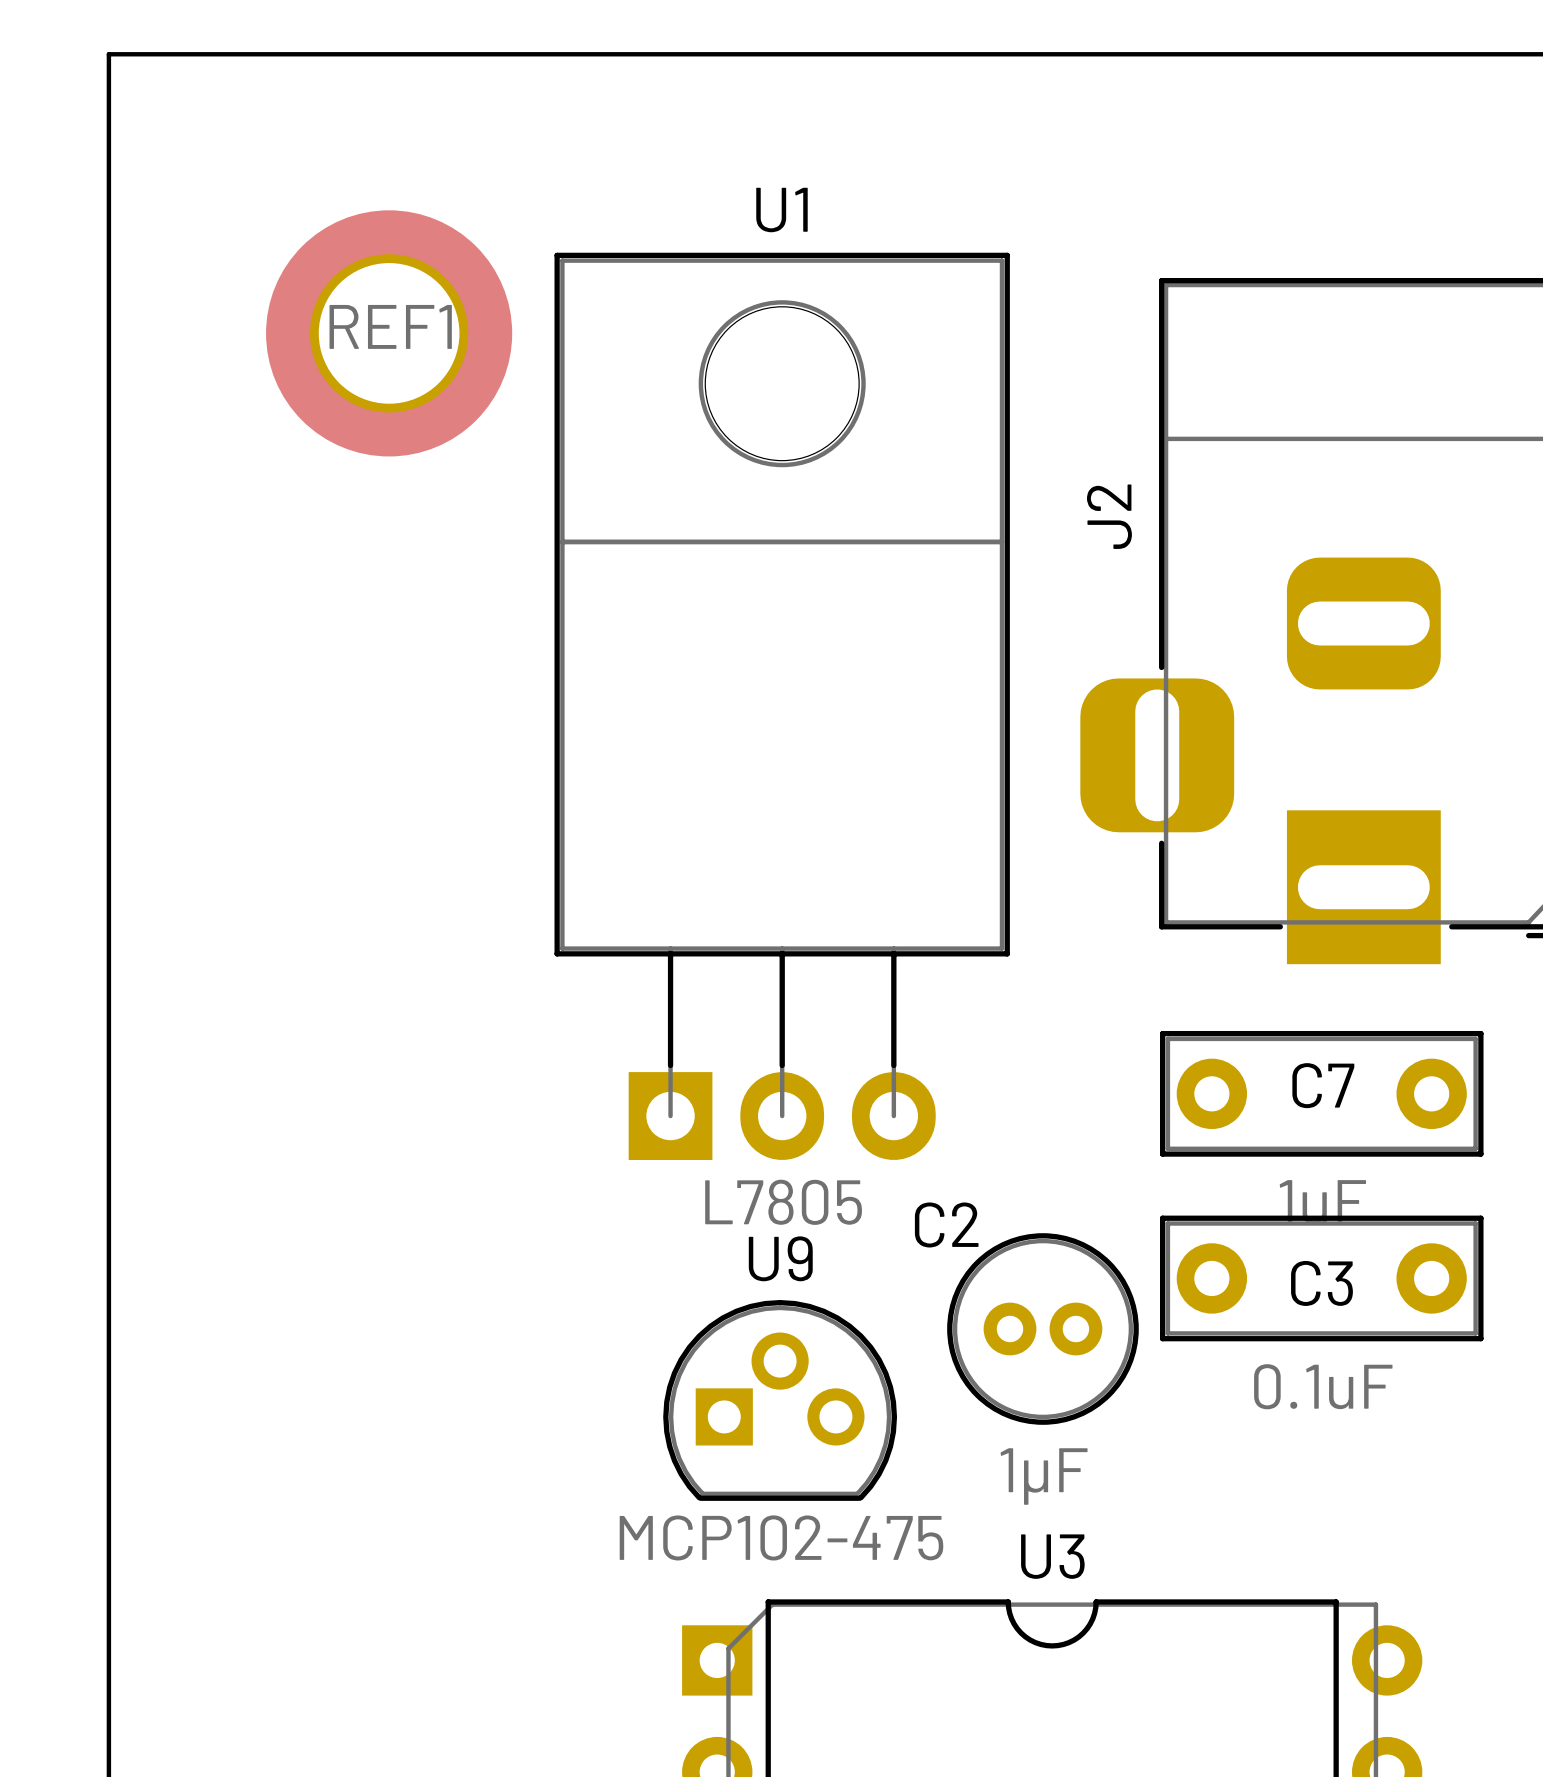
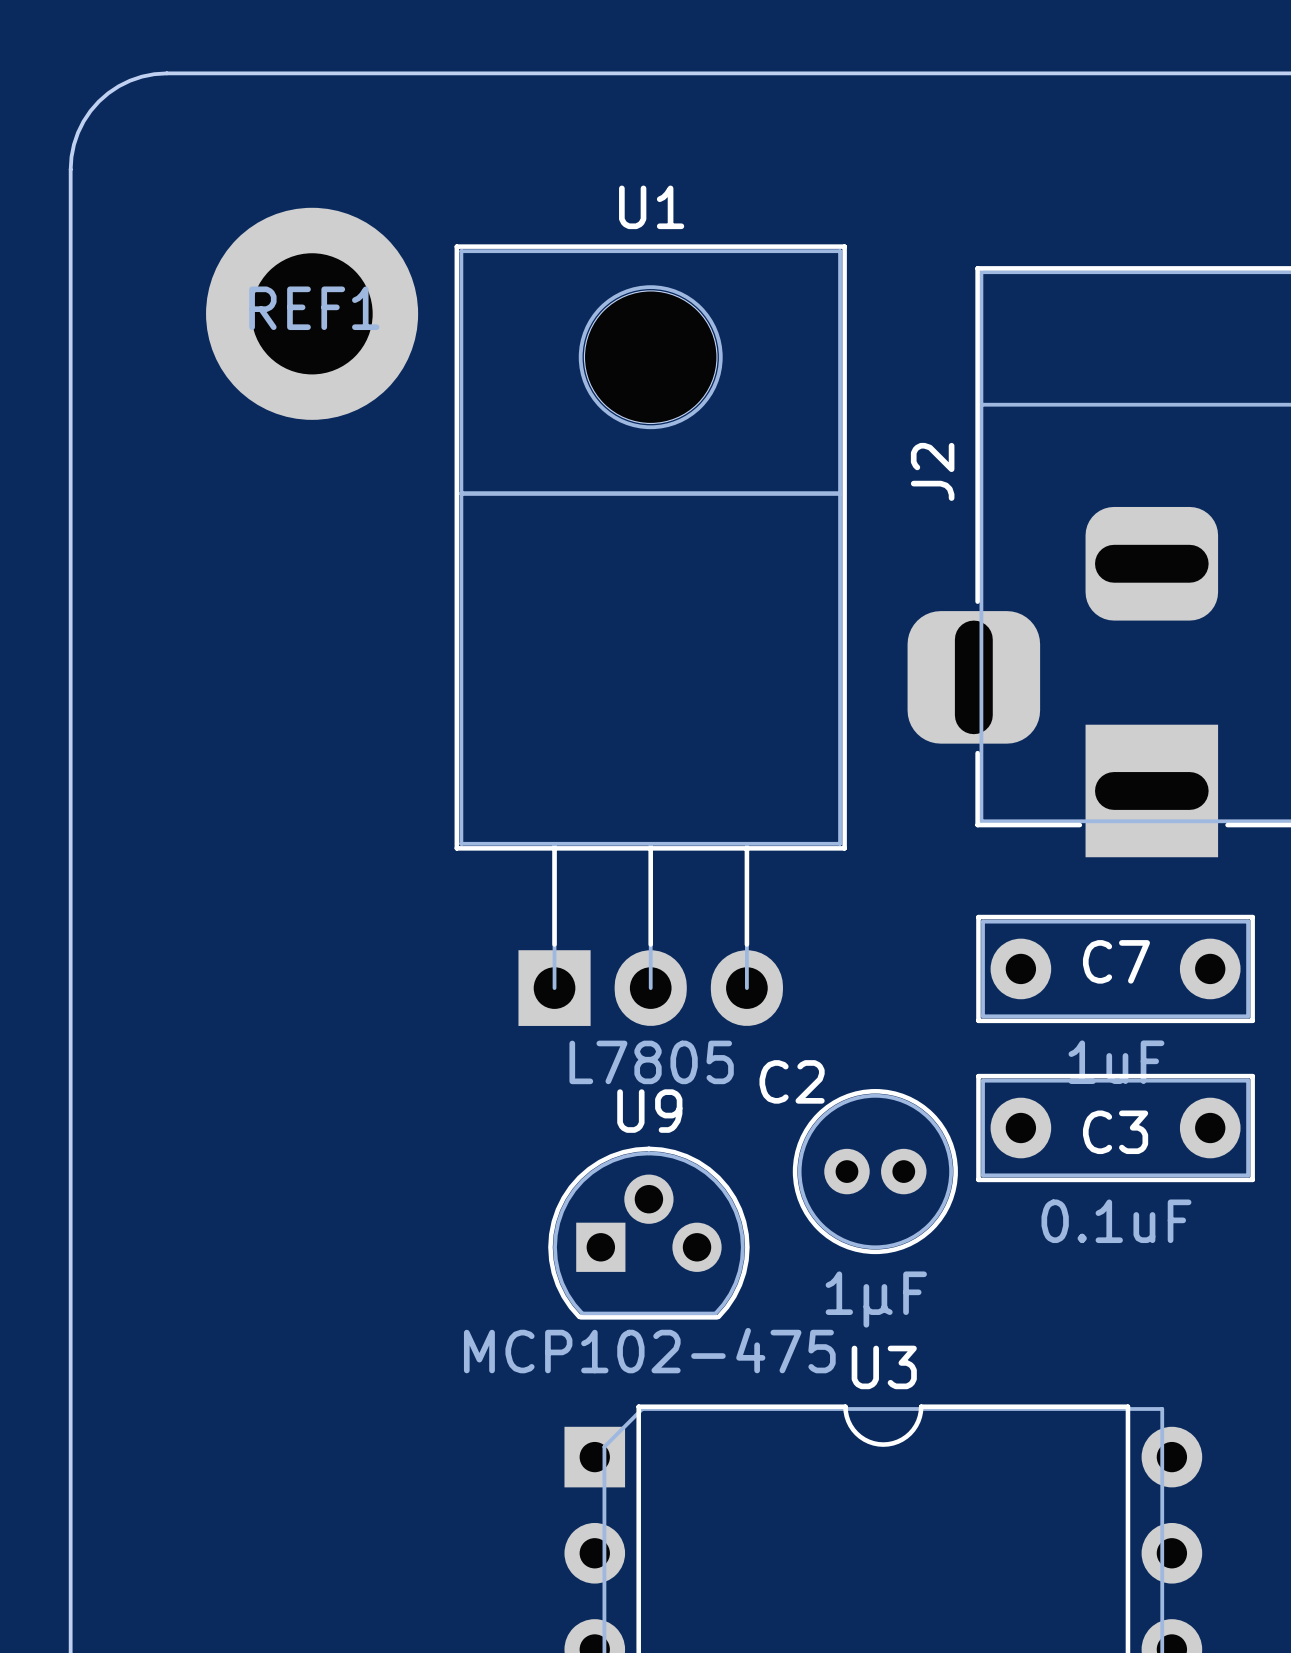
board edge: (220, 54) (108, 54) (108, 165) -> (166, 73) (154, 74) (130, 80) (108, 93) (98, 101) (83, 121) (77, 132) (73, 144) (70, 169)

